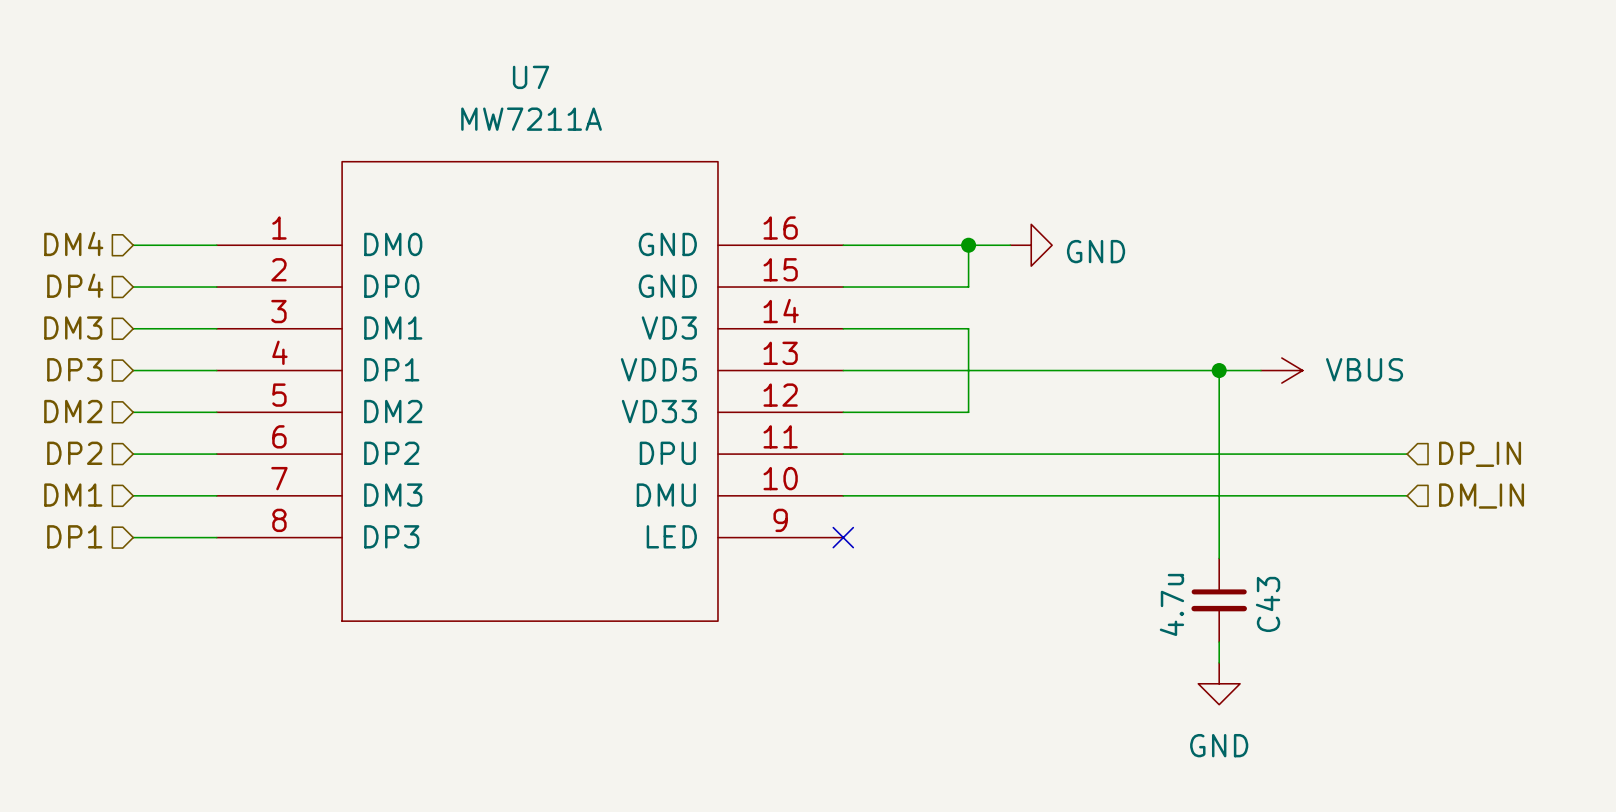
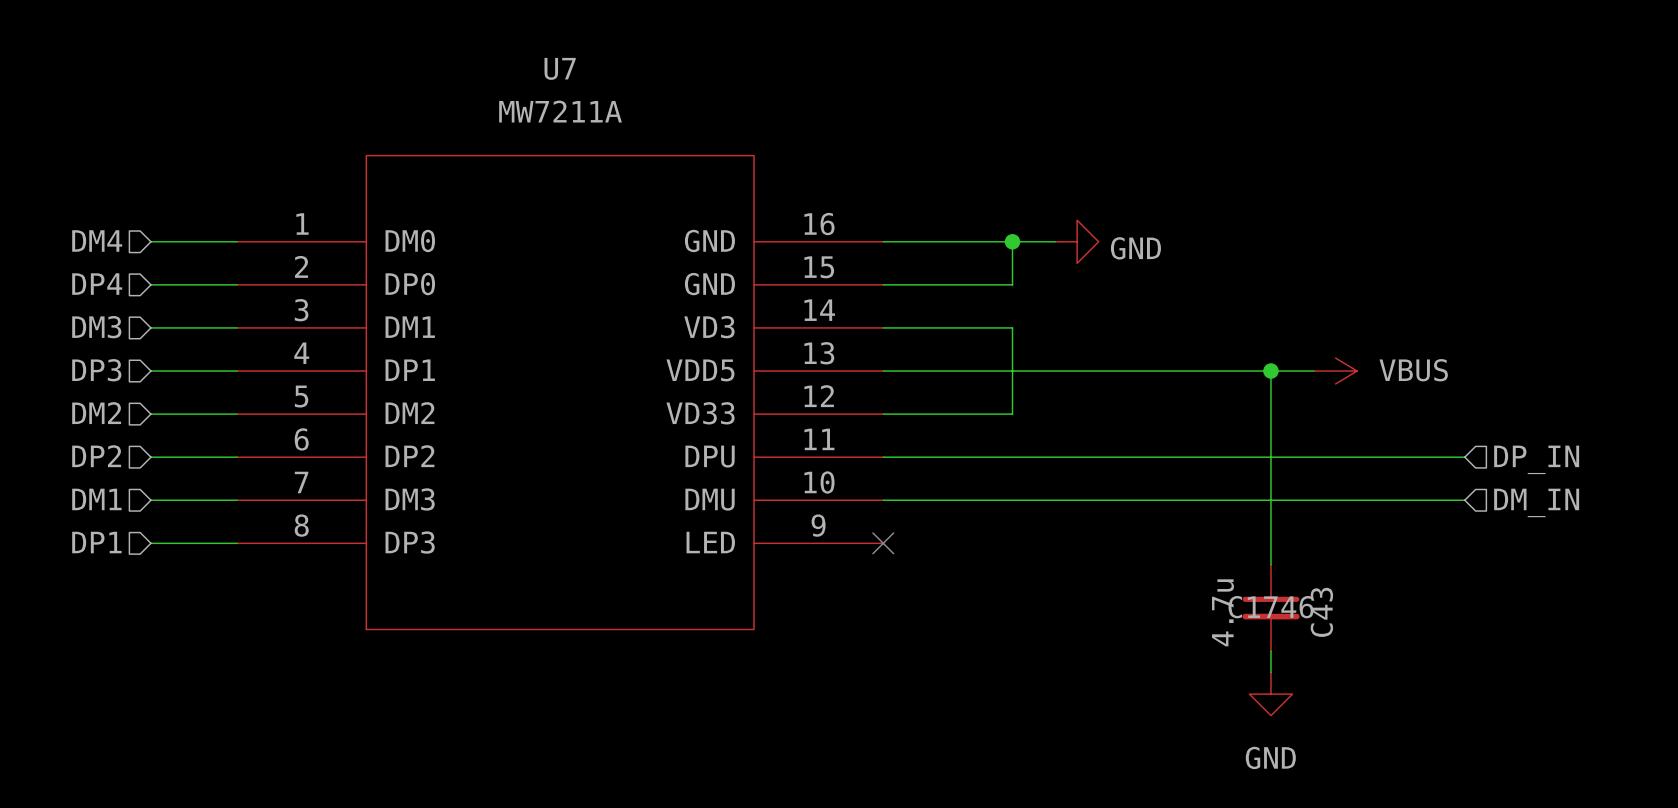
C43 text: none -> C1746 (1271, 607)

